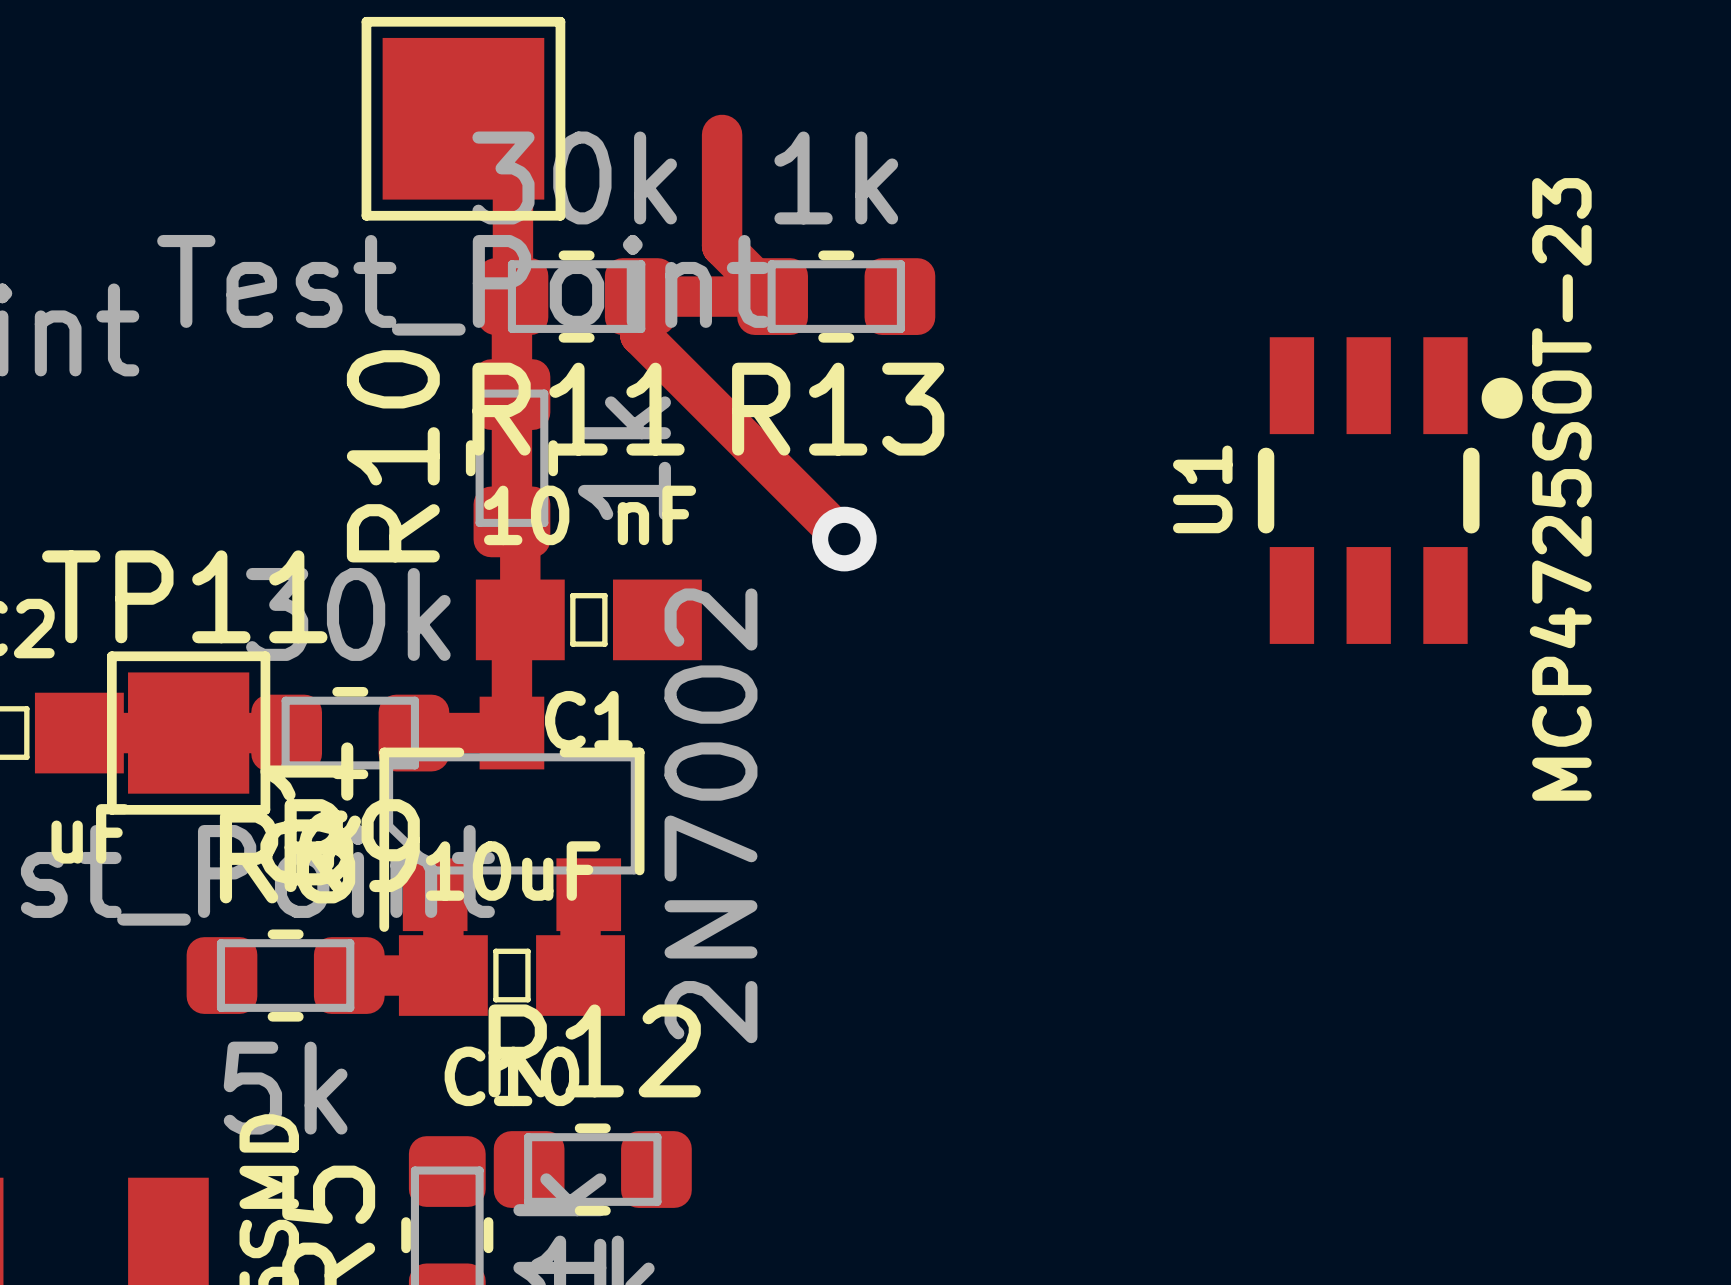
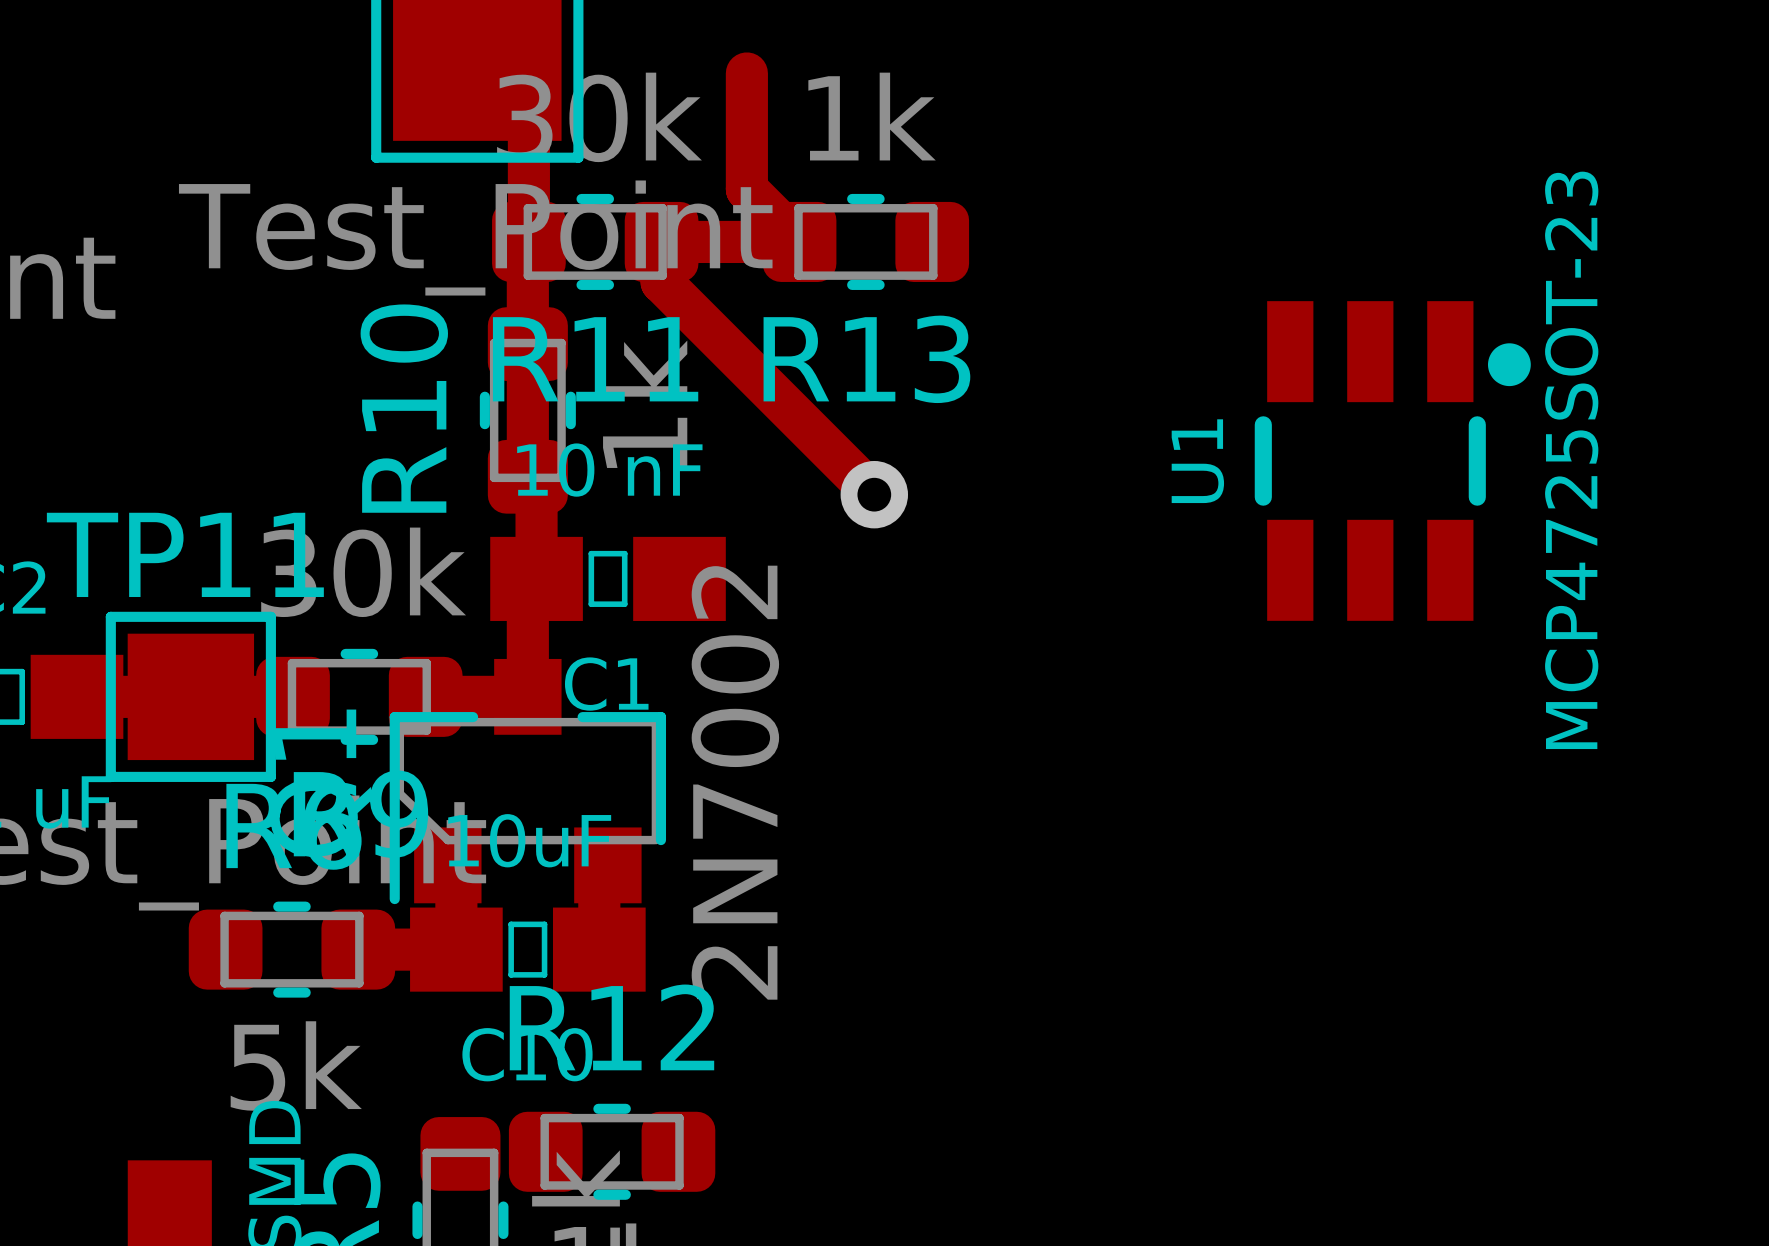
U1 position: (1390, 490) -> (1392, 460)

